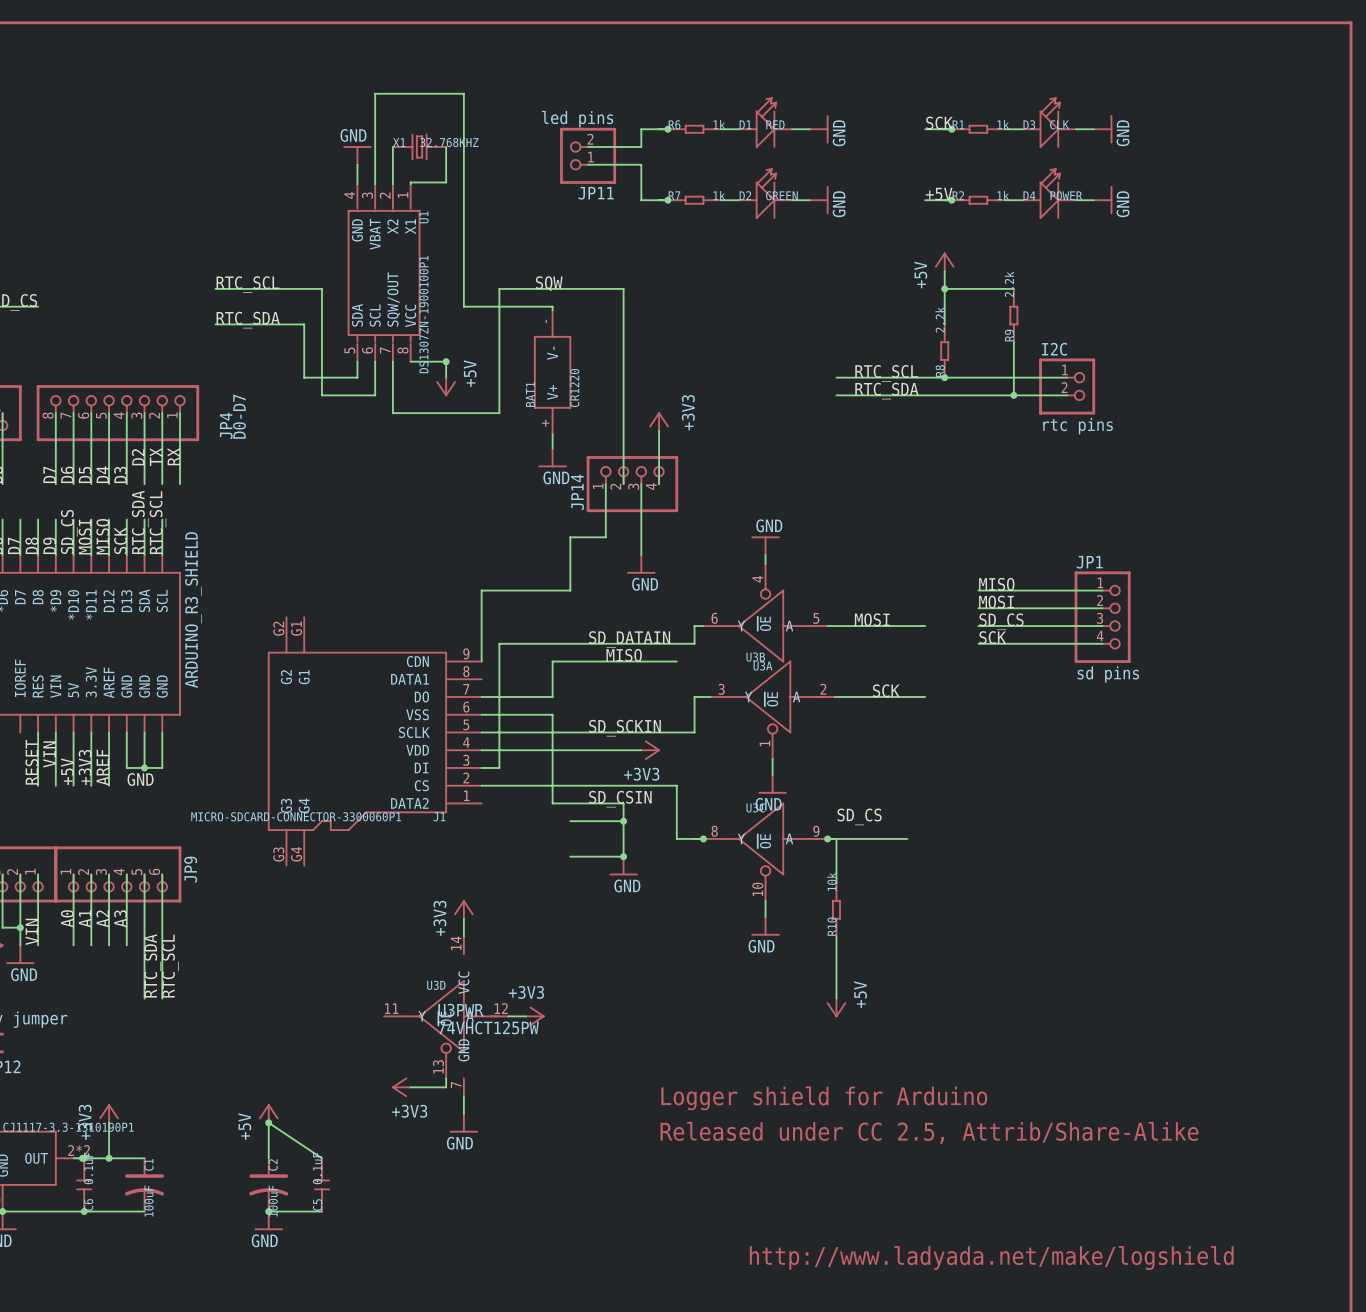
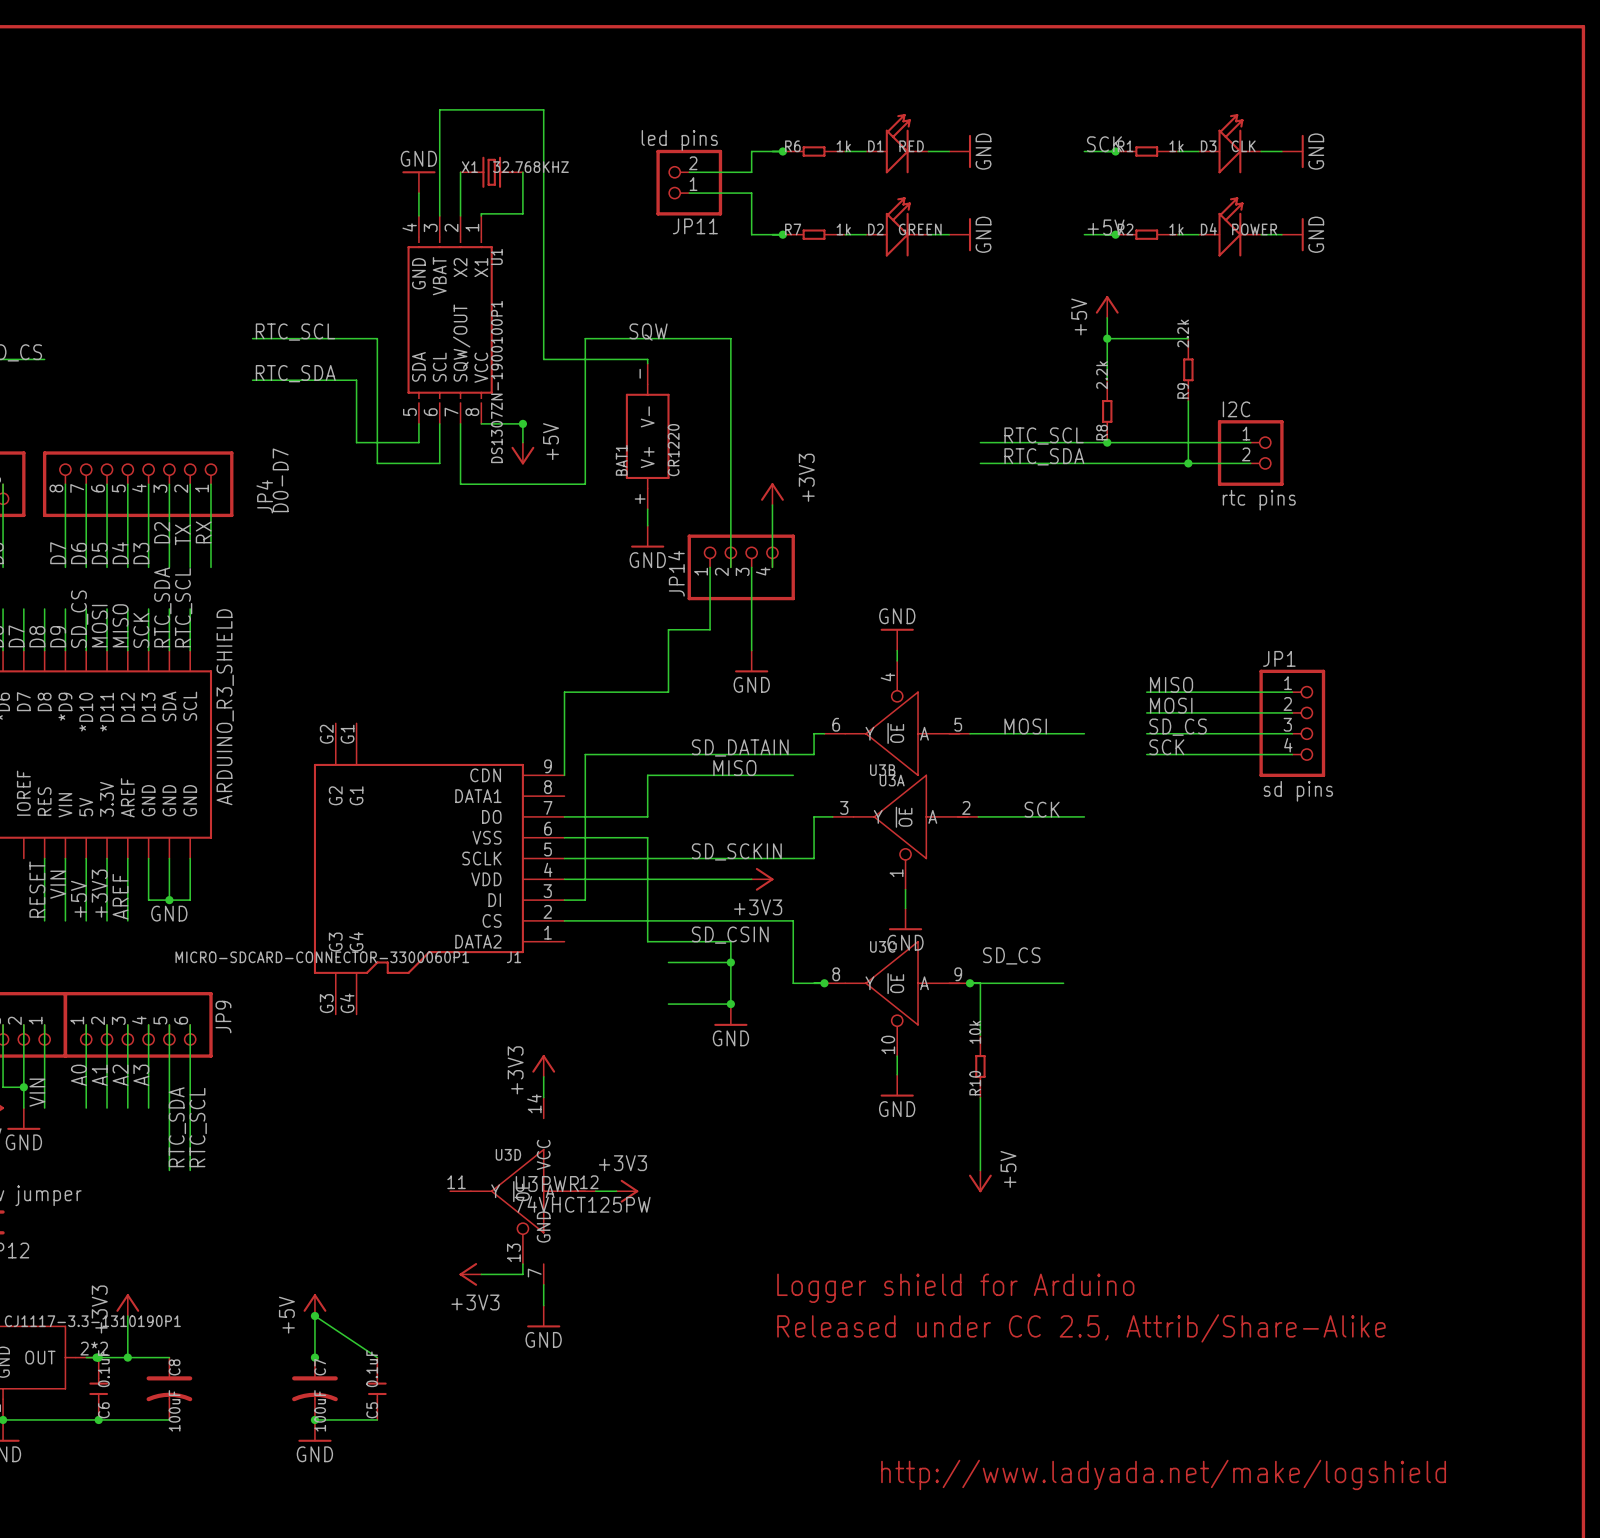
junction: none -> (314, 1357)
C1 name: C1 (148, 1164) -> C8 (174, 1367)
C2 name: C2 (273, 1164) -> C7 (320, 1367)

